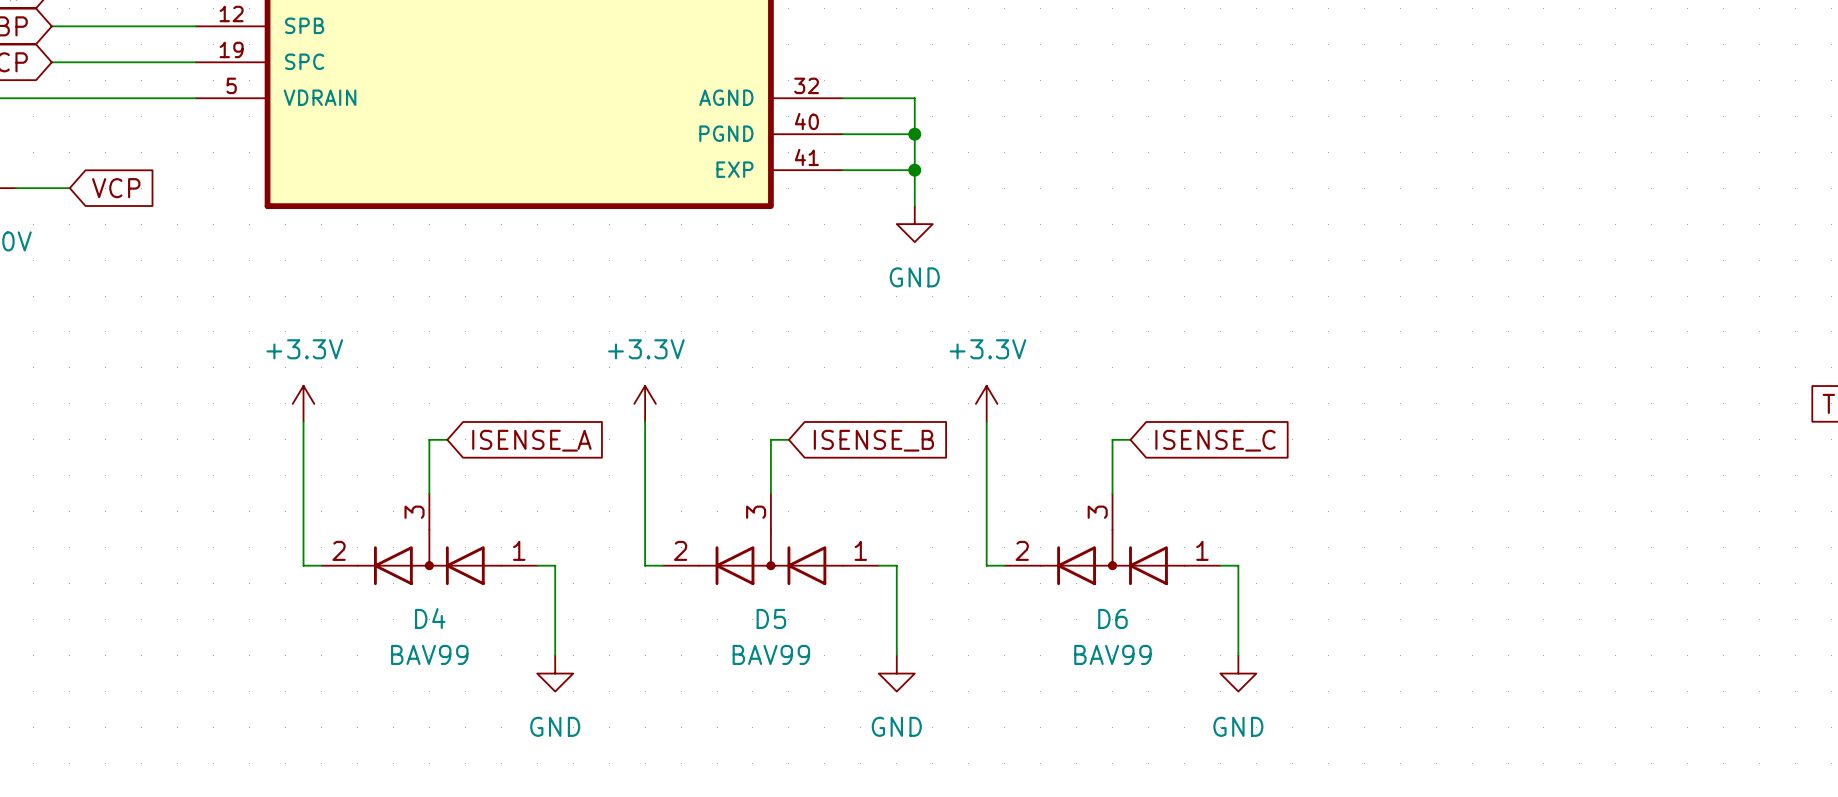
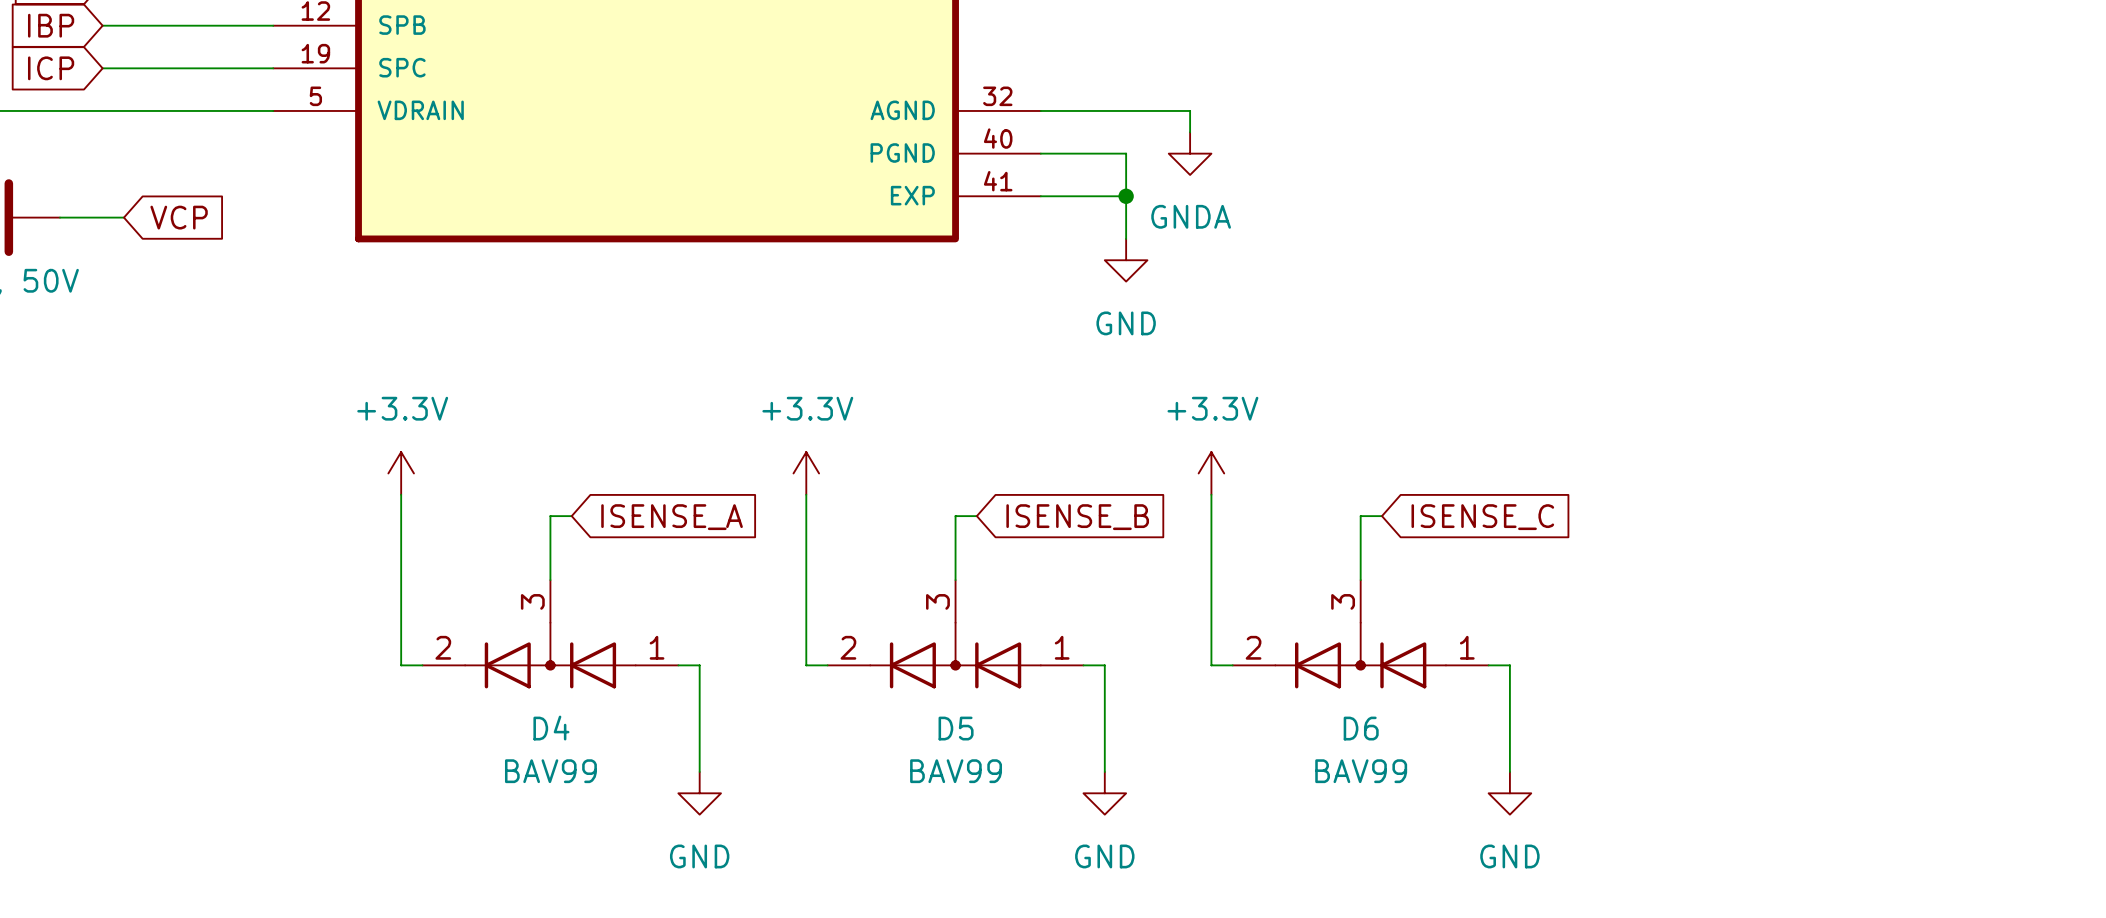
wire: (914, 98) (914, 134) -> (1126, 110) (1190, 110) (1190, 132)
junction: (914, 134) -> none
power symbol: none -> GNDA (1190, 153)

